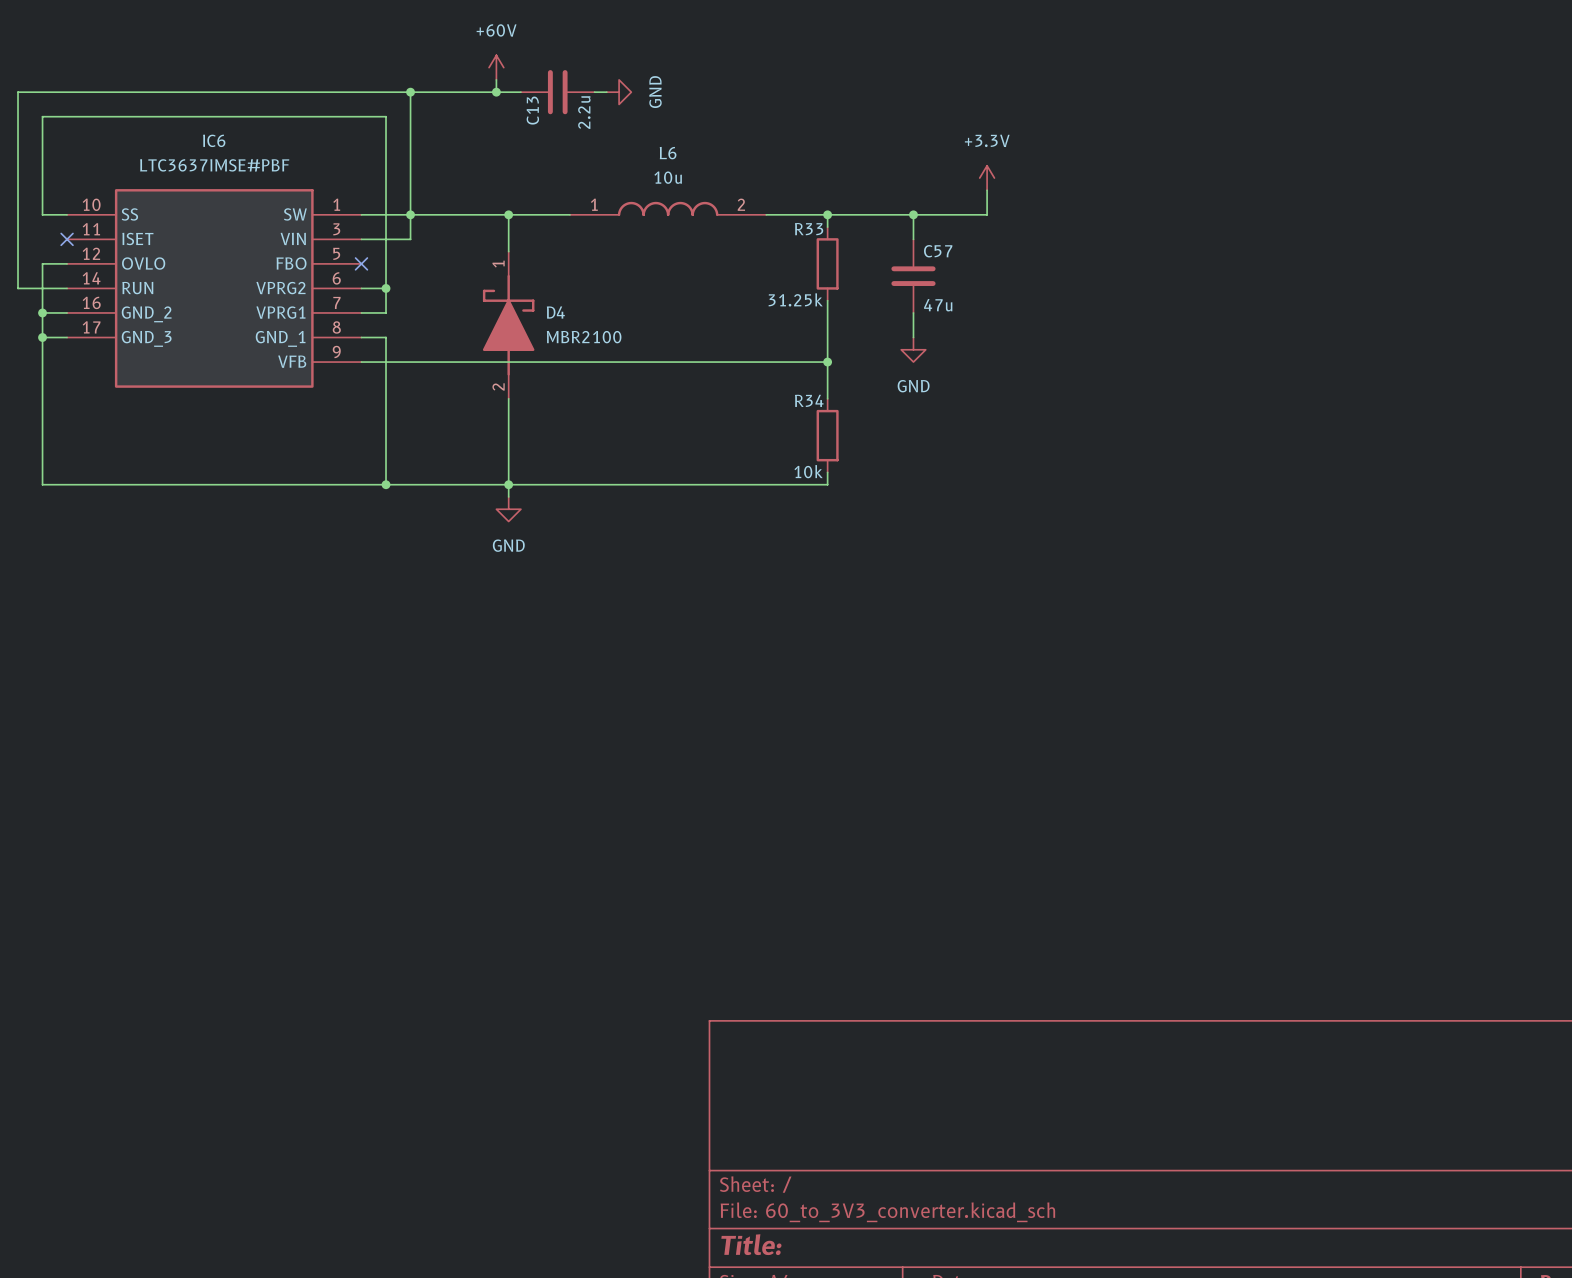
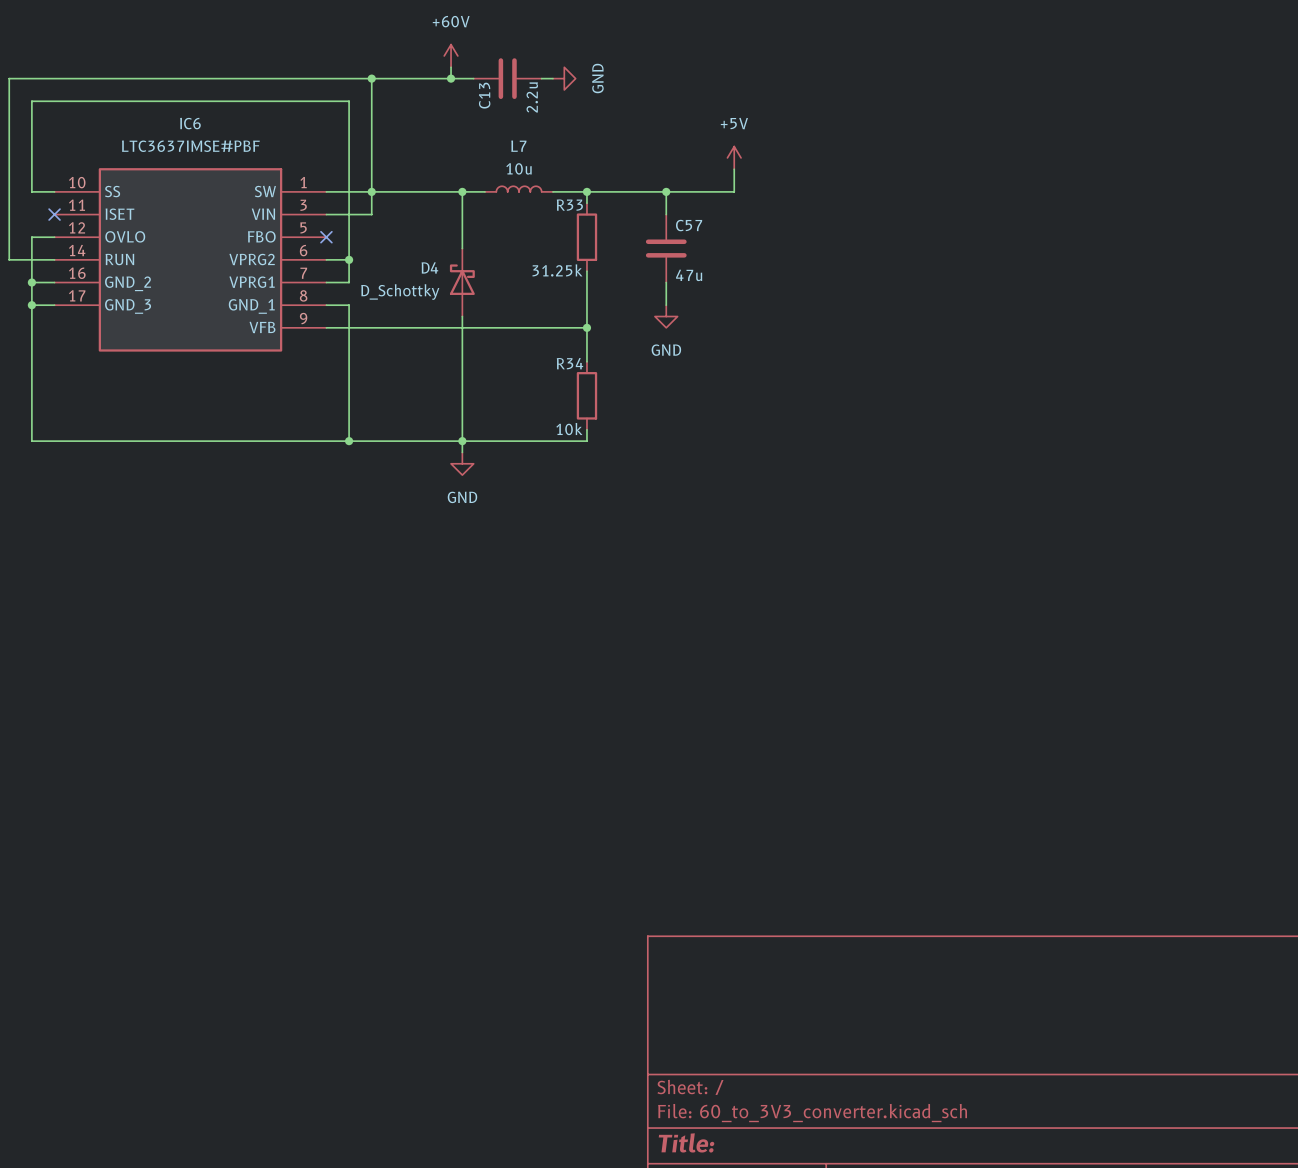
power symbol: none -> +5V (734, 157)
power symbol: +3.3V (987, 178) -> none
wire: (987, 190) (987, 214) (803, 214) -> (734, 169) (734, 191)
L6: 10u (668, 208) -> none
L7: none -> 10u (519, 189)
wire: (533, 214) (570, 214) -> none
wire: none -> (552, 191) (700, 191)
junction: none -> (586, 191)
junction: none -> (666, 191)
wire: (827, 214) (827, 227) -> (586, 191) (586, 203)
junction: (827, 214) -> none
wire: (913, 214) (913, 239) -> (666, 191) (666, 214)
junction: (913, 214) -> none
D4 symbol: [482, 251, 535, 399] -> [449, 248, 475, 317]
R33 position: (827, 263) -> (586, 237)
C57 position: (913, 276) -> (666, 248)
wire: (827, 300) (827, 398) -> (586, 271) (586, 361)
D4 name position: D4 (555, 312) -> D4 (429, 267)
wire: (913, 312) (913, 337) -> (666, 282) (666, 305)
D4 value: MBR2100 (584, 337) -> D_Schottky (400, 292)
power symbol position: GND (913, 349) -> GND (666, 316)
wire: (643, 362) (827, 362) -> none
junction: none -> (586, 327)
junction: (827, 362) -> none
R34 position: (827, 435) -> (586, 395)
wire: (827, 472) (827, 484) (643, 484) -> (586, 429) (586, 441)

